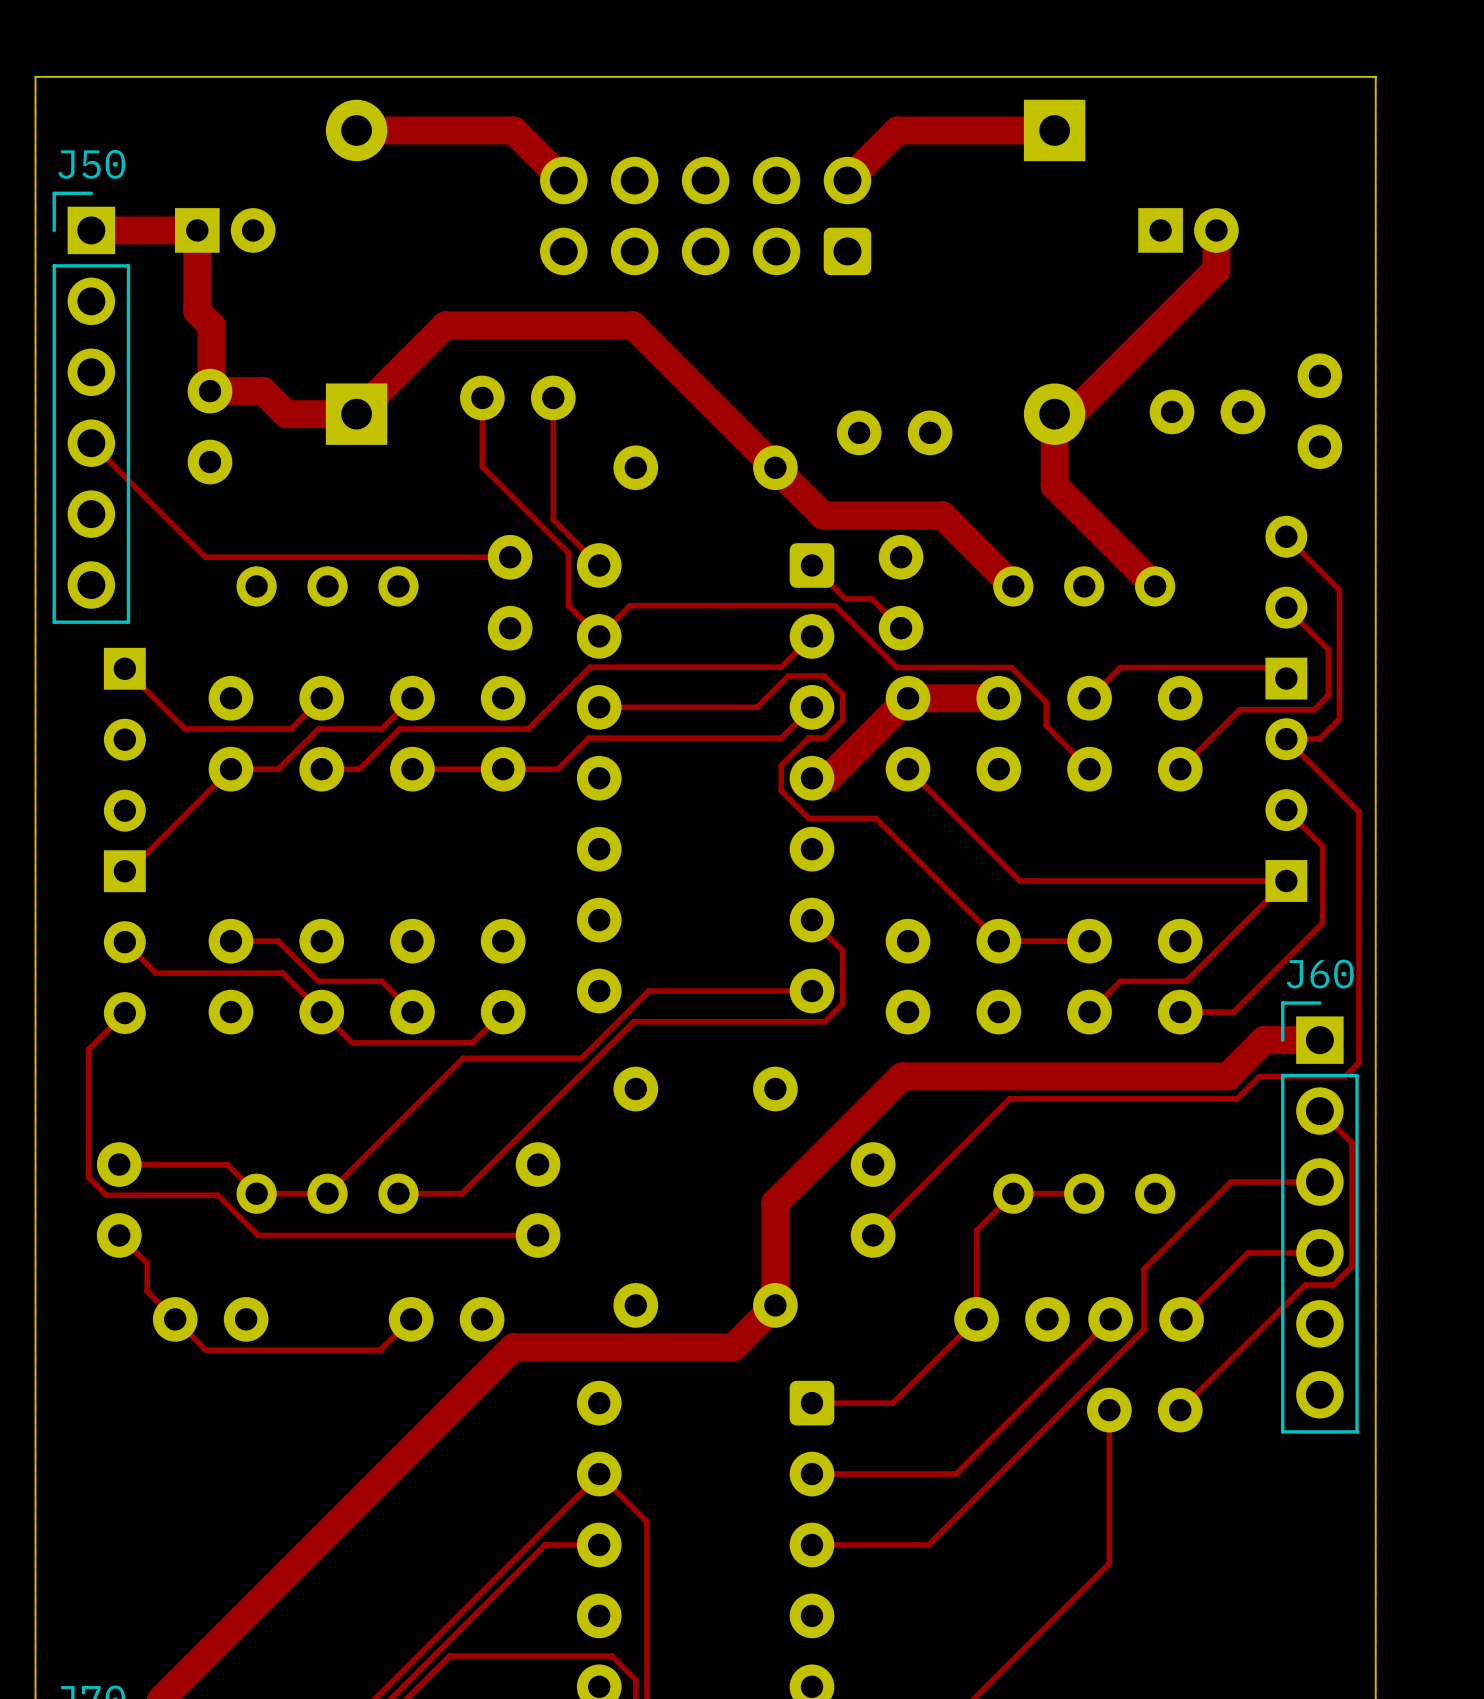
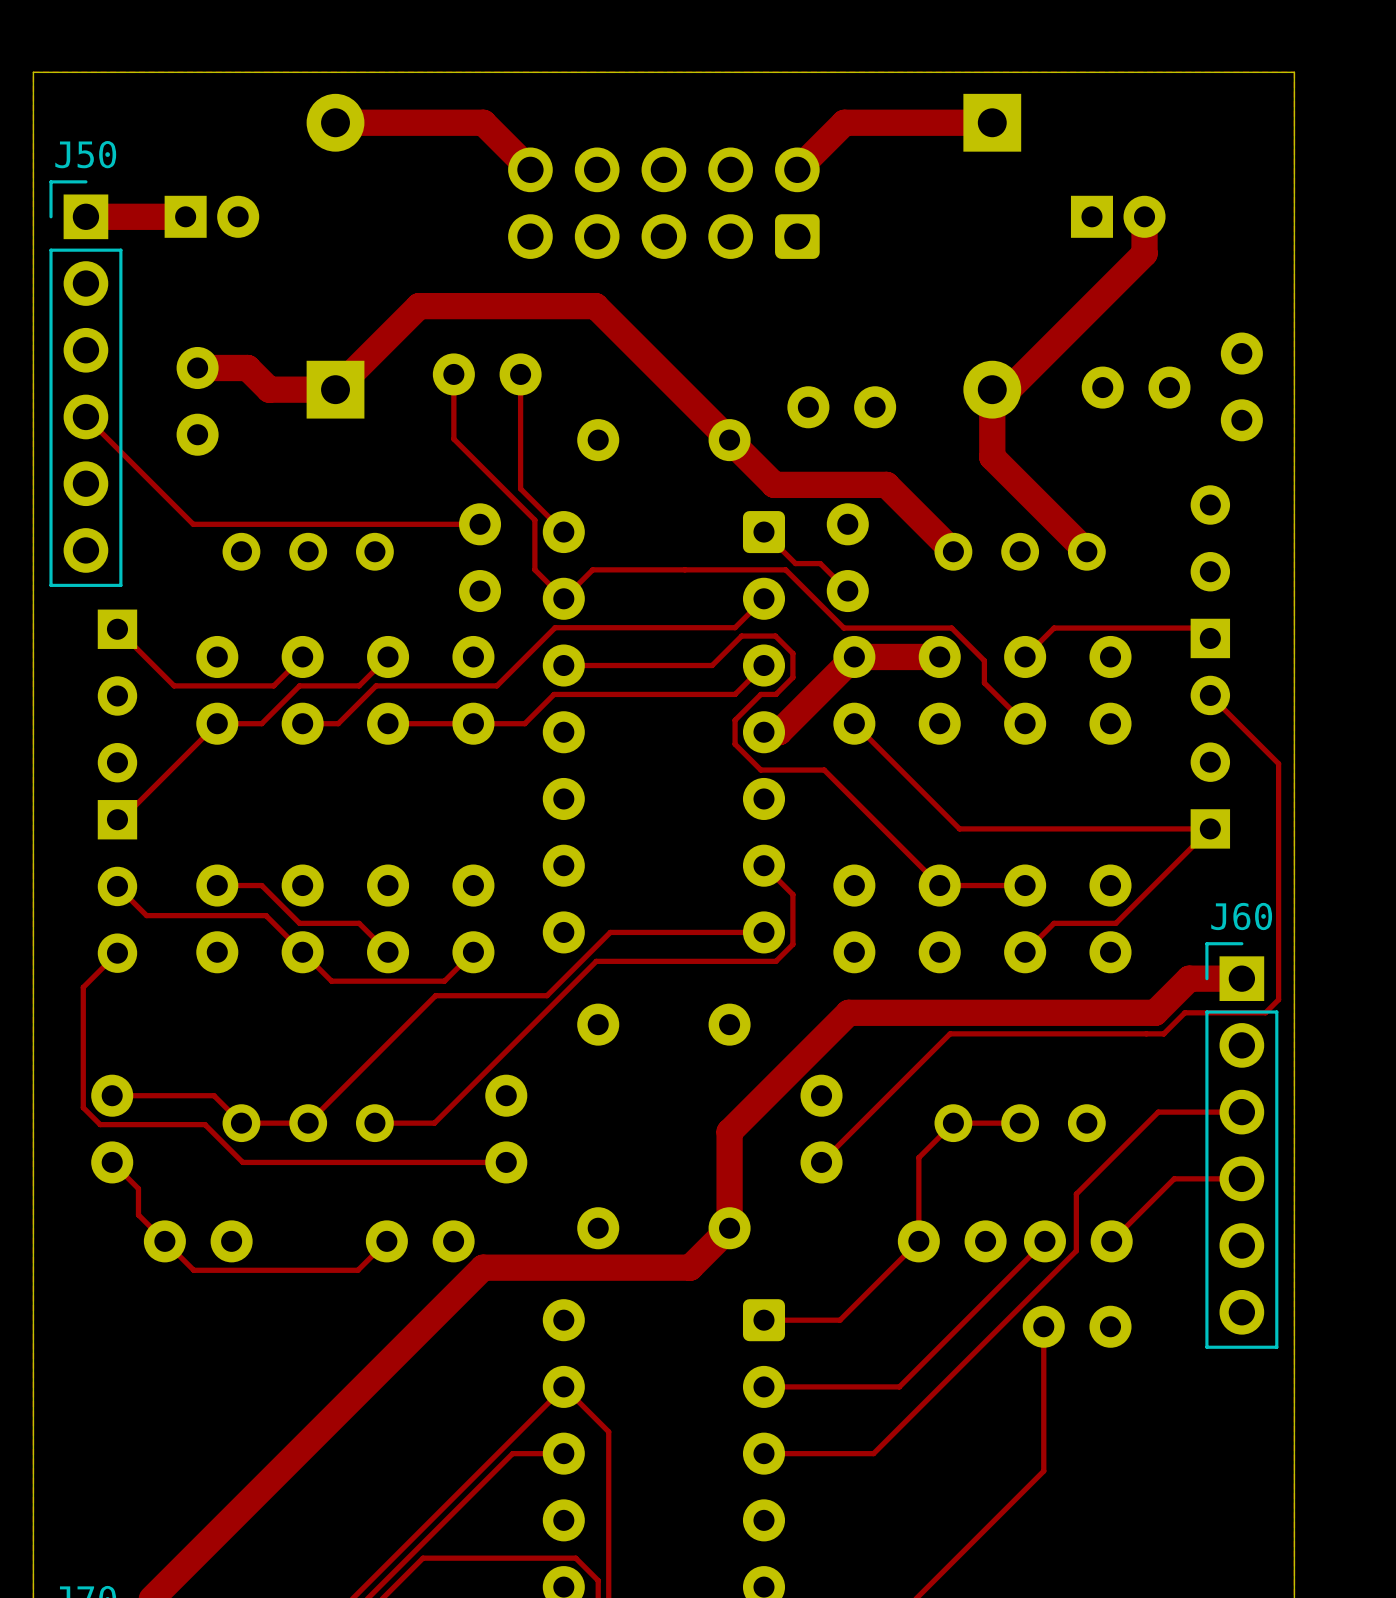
track: (197, 230) (197, 311) (211, 325) (210, 391) -> none
track: (1286, 536) (1339, 589) (1339, 719) (1319, 739) (1286, 739) -> none
track: (1286, 607) (1328, 649) (1328, 695) (1313, 709) (1239, 709) (1180, 769) -> none
track: (1286, 810) (1322, 846) (1322, 922) (1233, 1012) (1180, 1012) -> none
track: (1319, 1111) (1352, 1143) (1352, 1266) (1333, 1285) (1305, 1285) (1180, 1410) -> none

